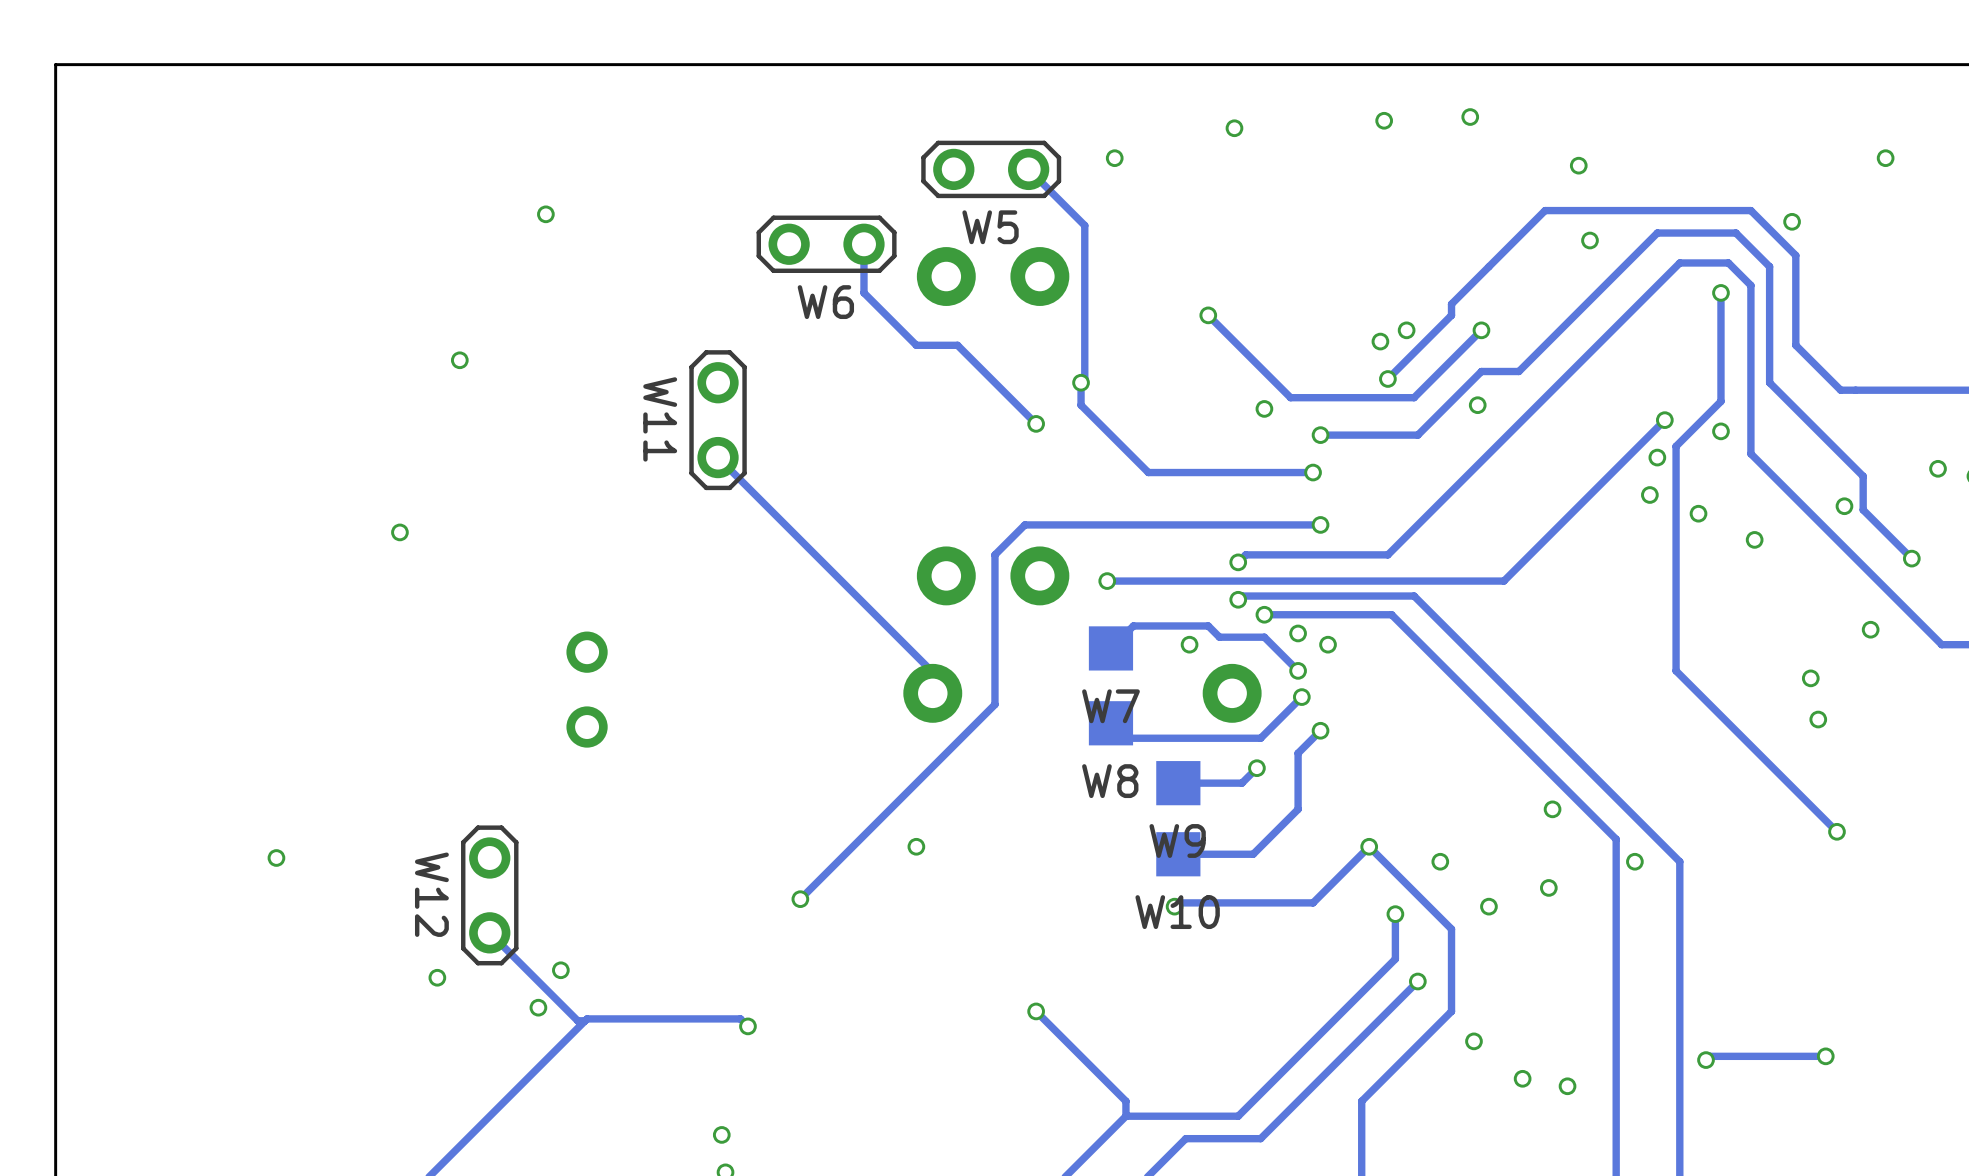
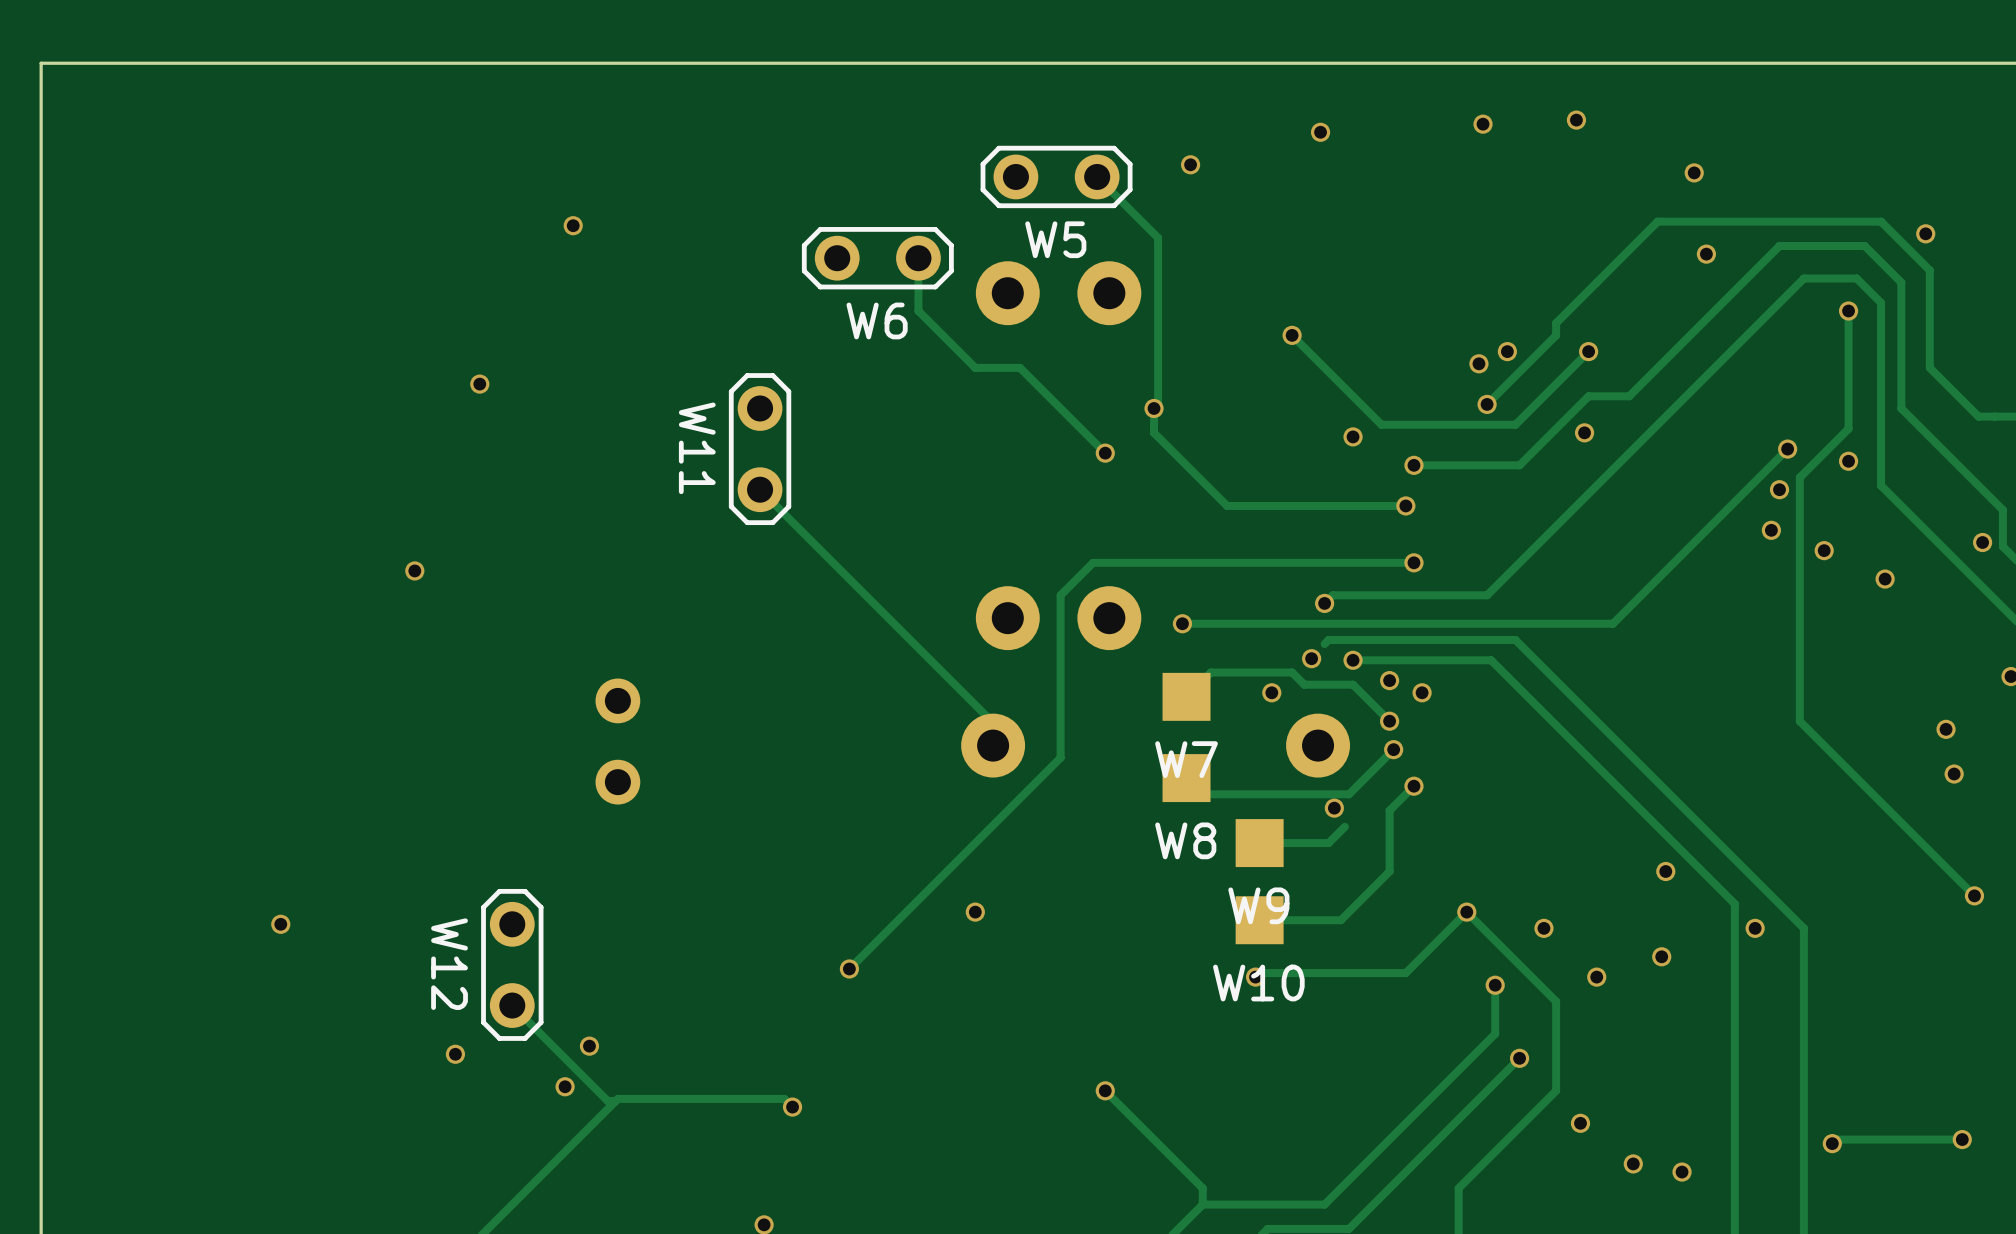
via position: (1238, 599) -> (1311, 658)
via position: (1256, 768) -> (1334, 808)

